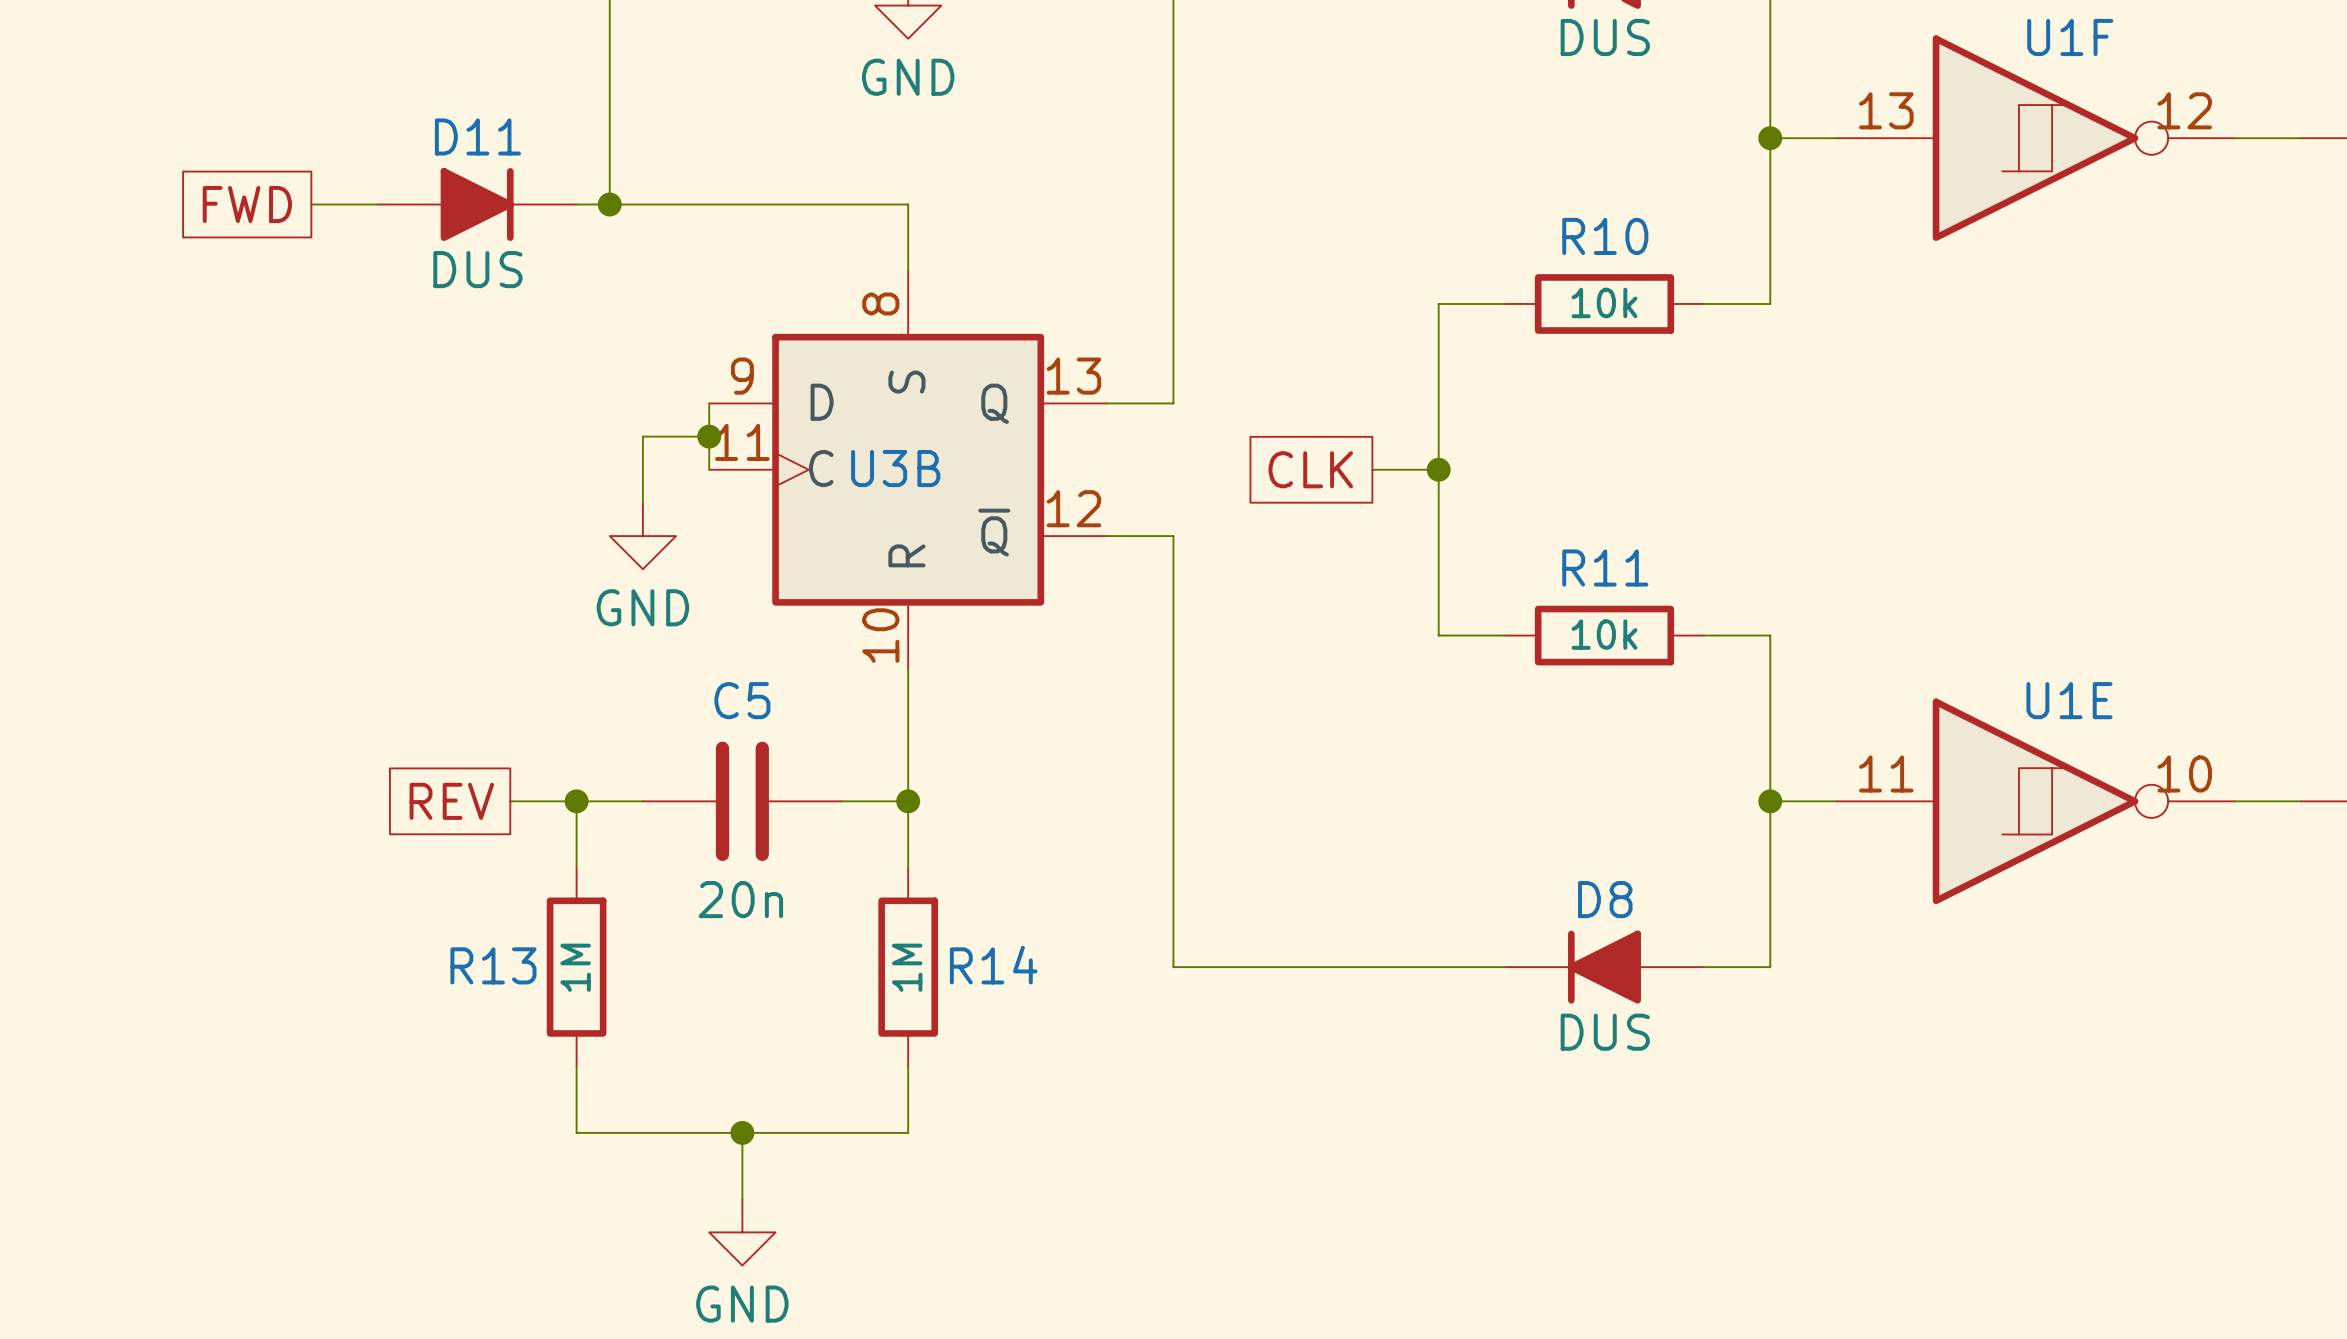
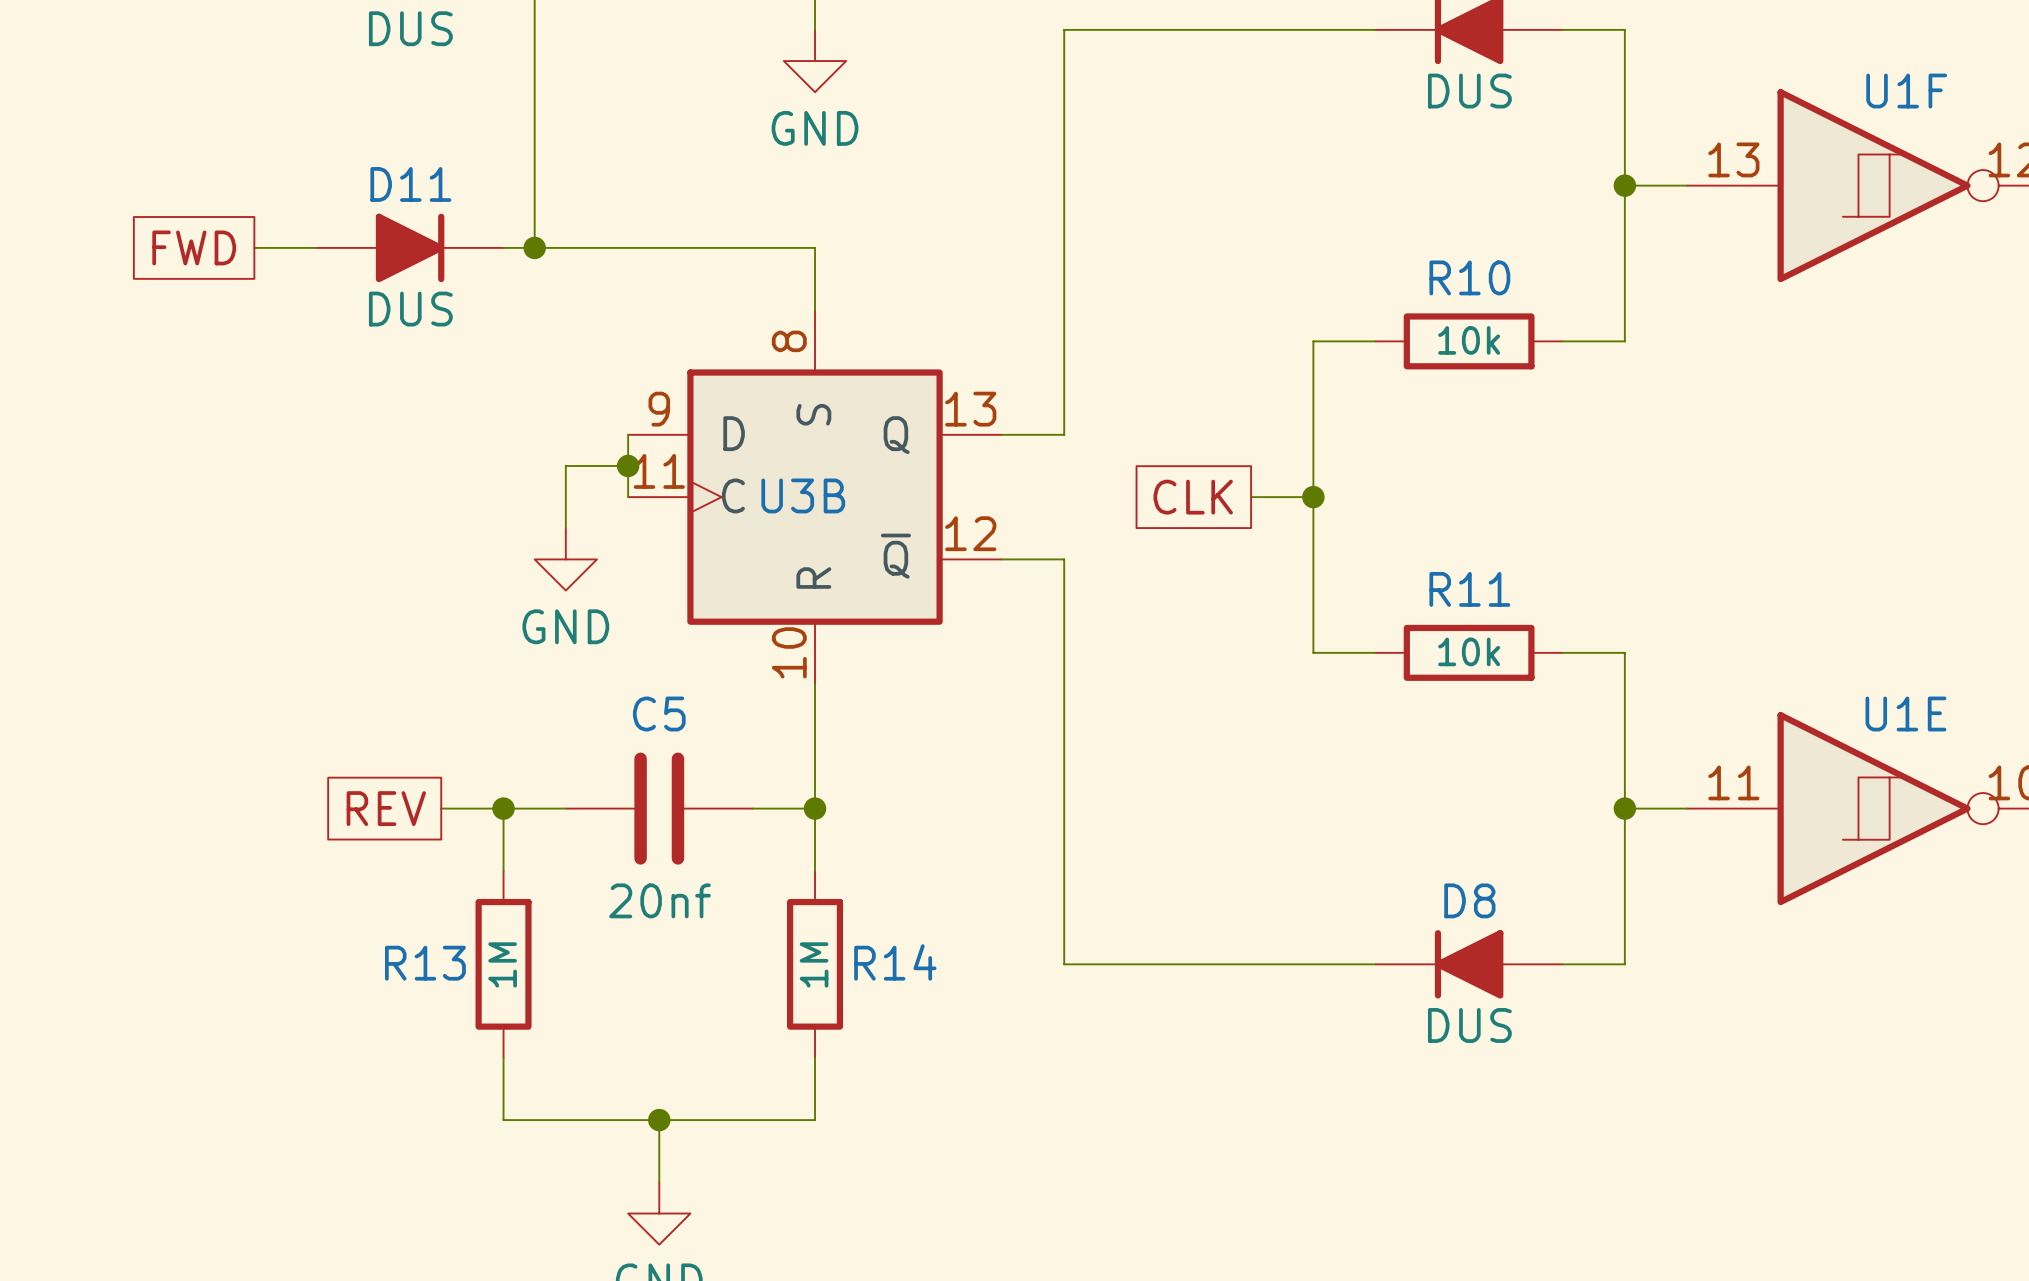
C5 value: 20n (740, 899) -> 20nf (660, 900)

